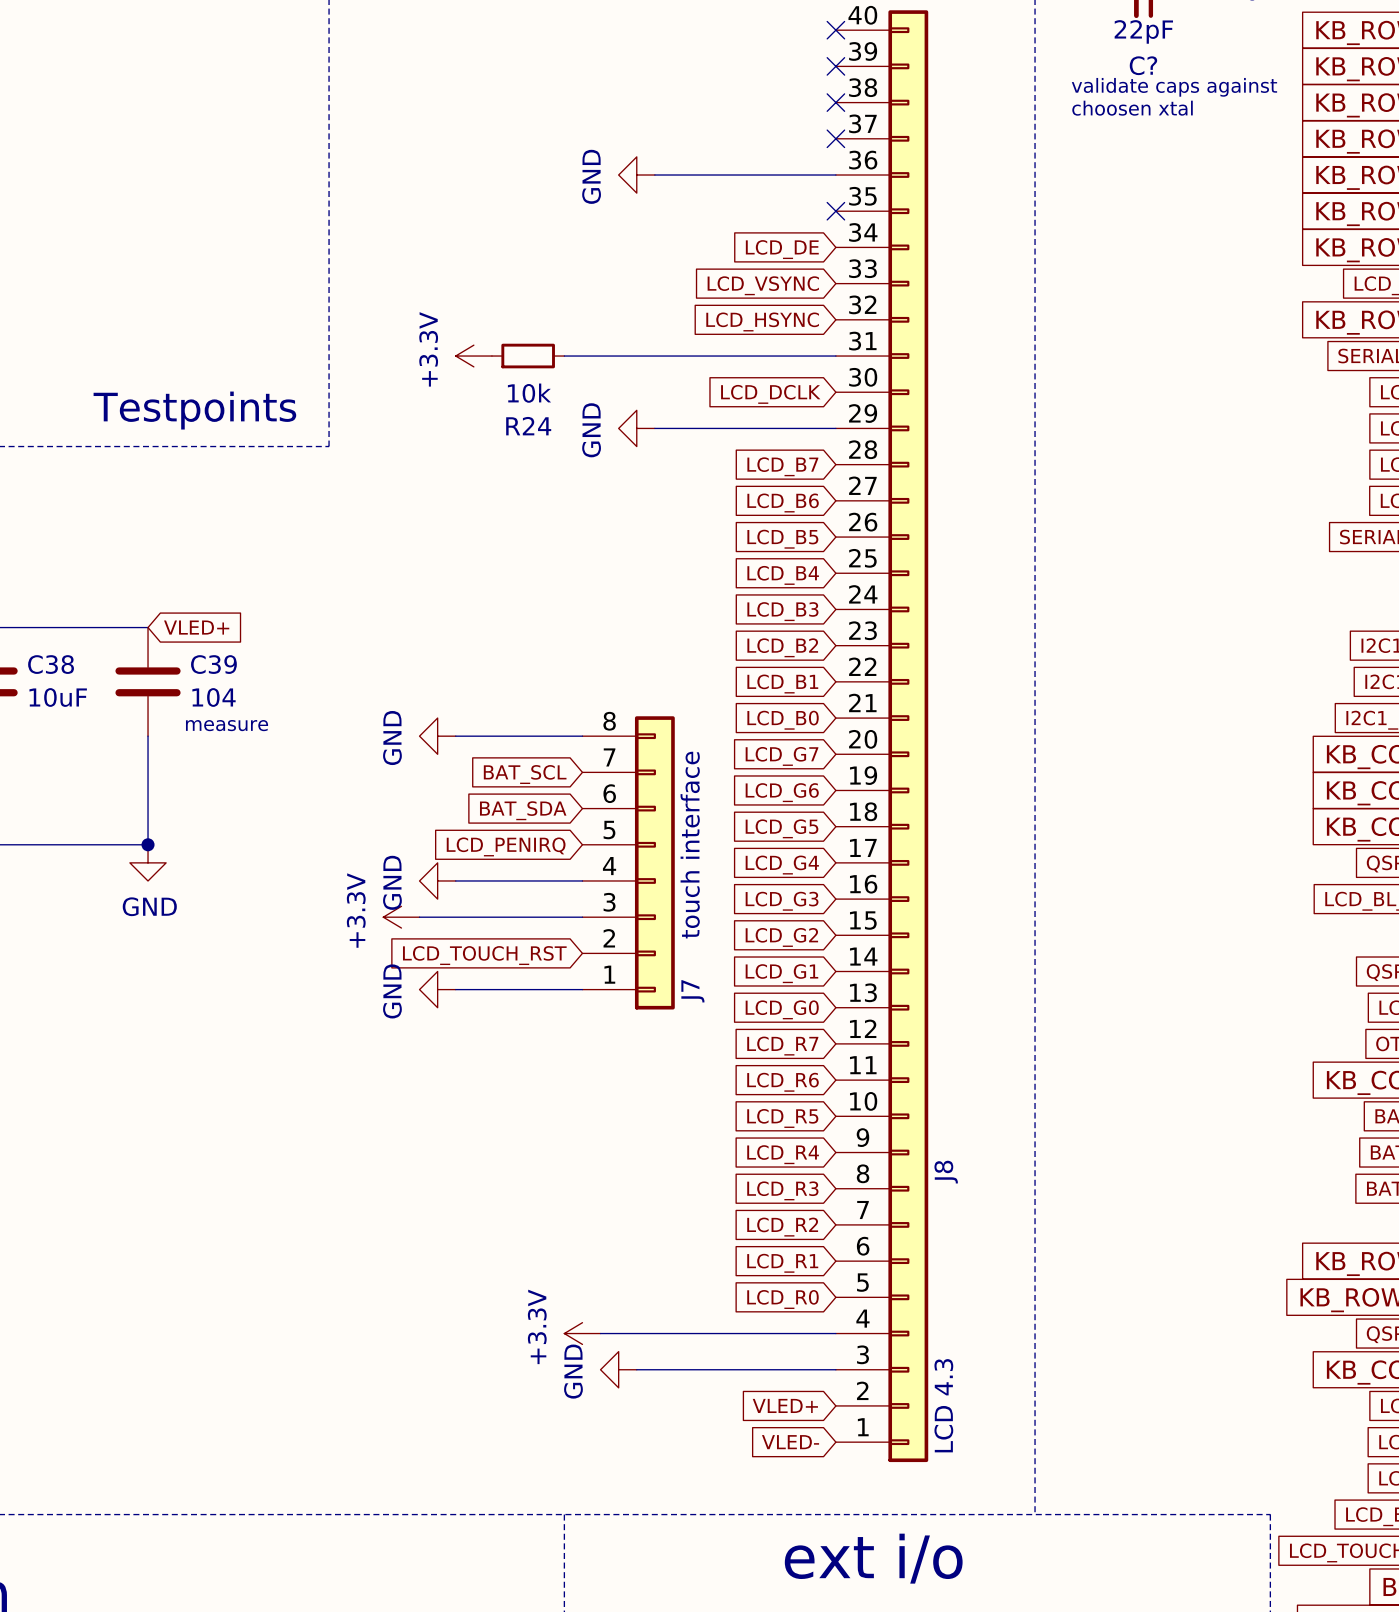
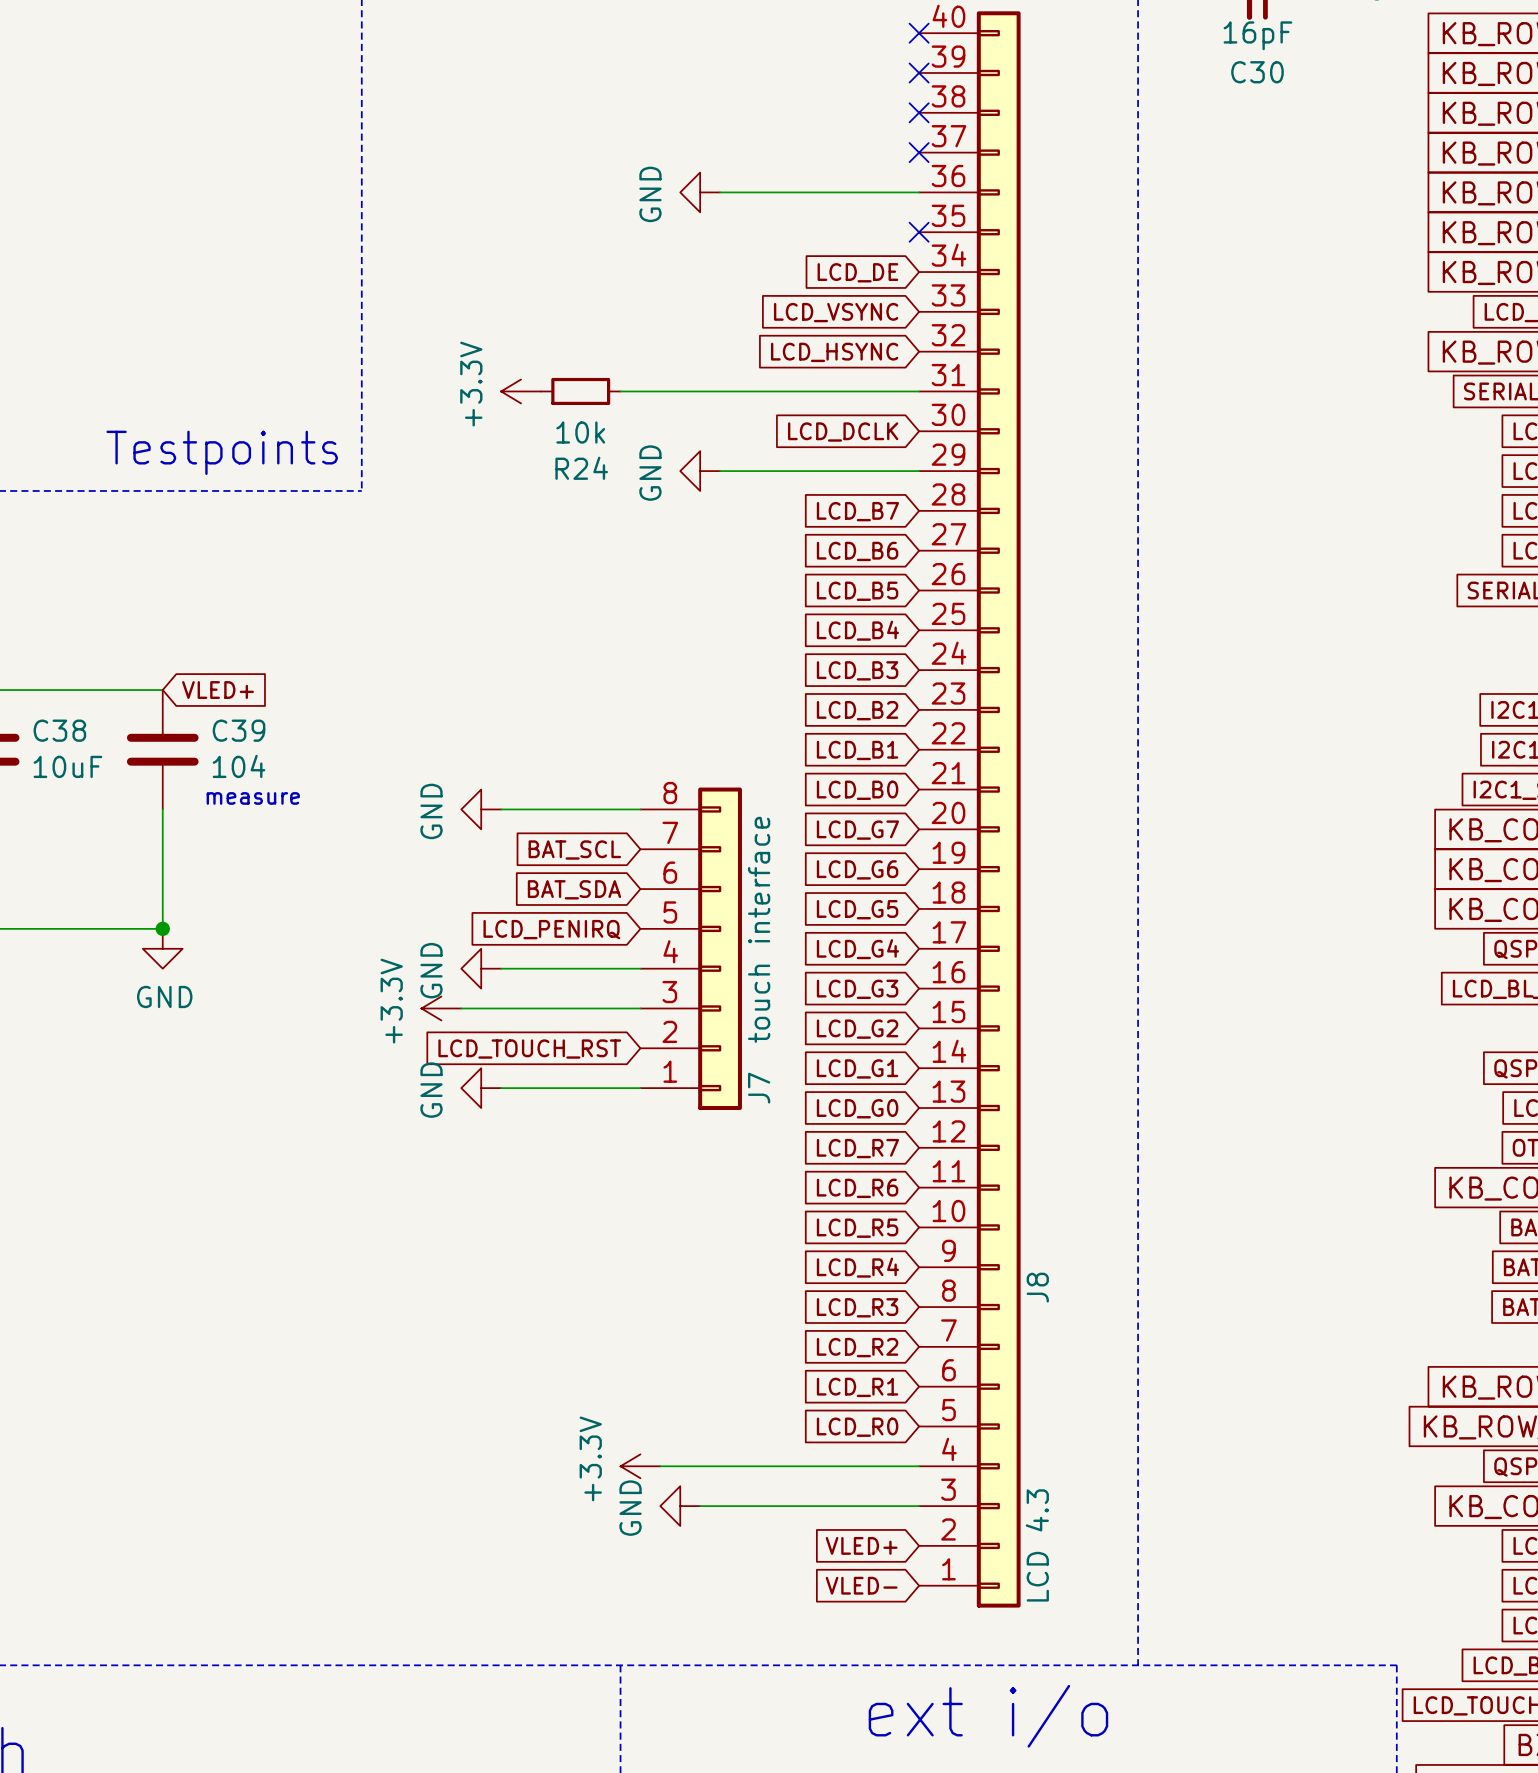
C? value: 22pF (1143, 31) -> 16pF (1257, 35)
C? name: C? (1143, 65) -> C30 (1257, 72)
text: validate caps against (1174, 87) -> none
text: choosen xtal (1132, 108) -> none

